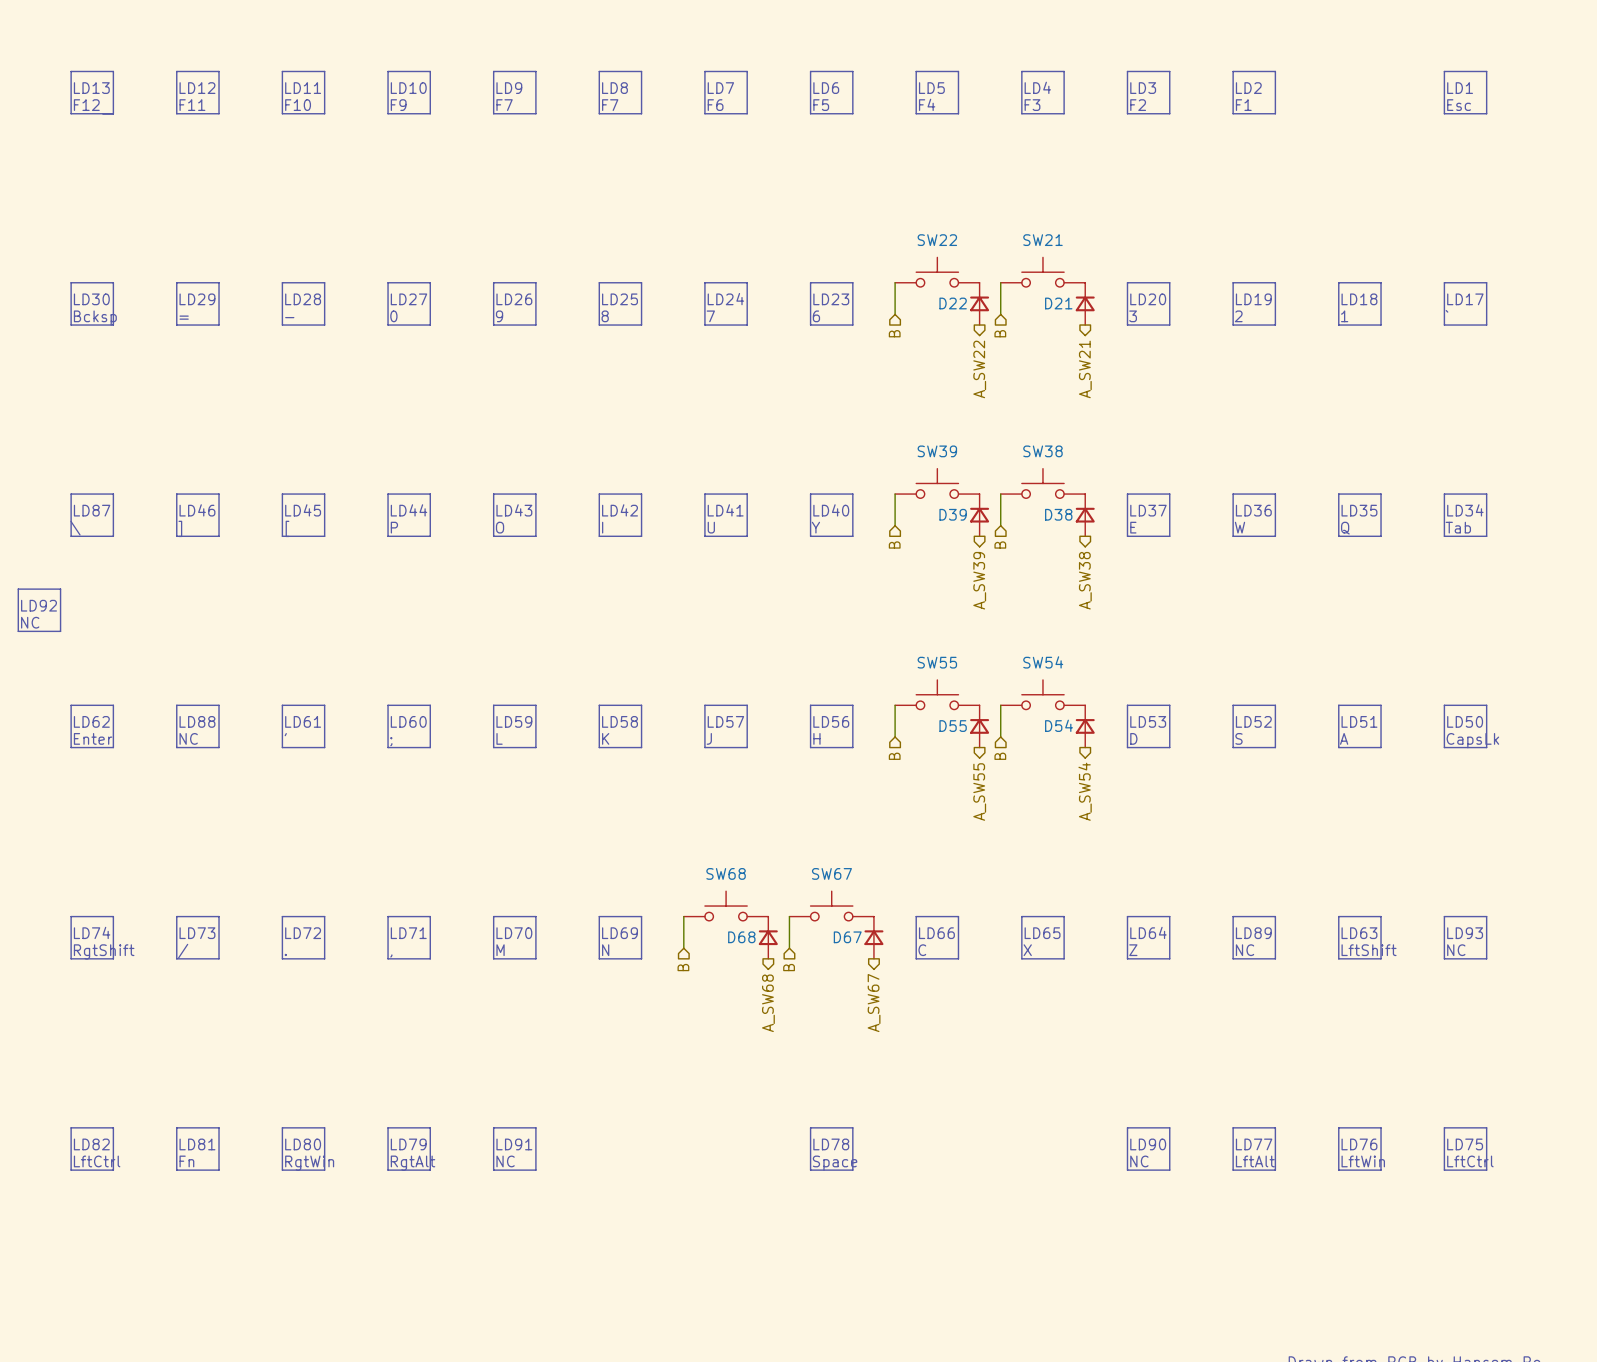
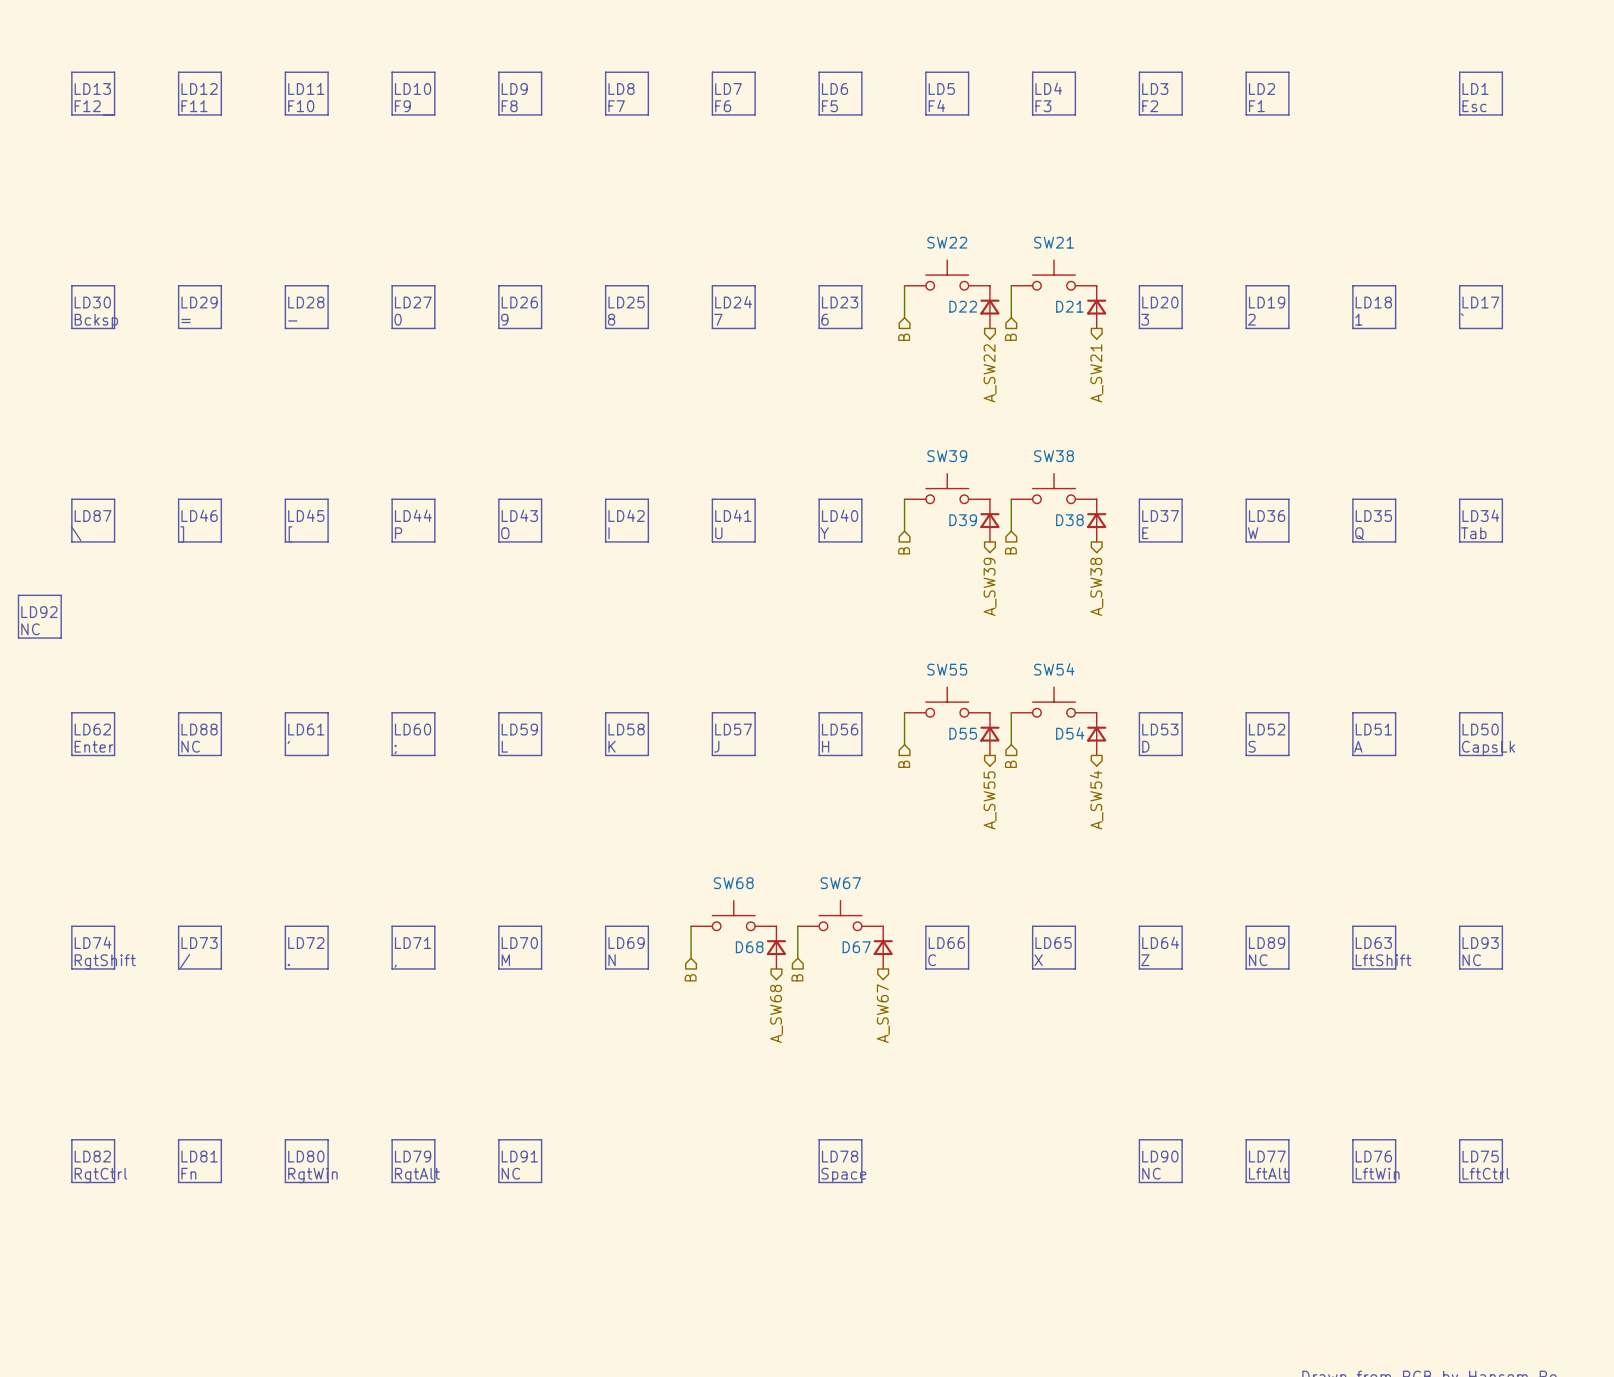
text: F7 (504, 105) -> F8 (509, 106)
text: LftCtrl (97, 1161) -> RgtCtrl (100, 1175)

